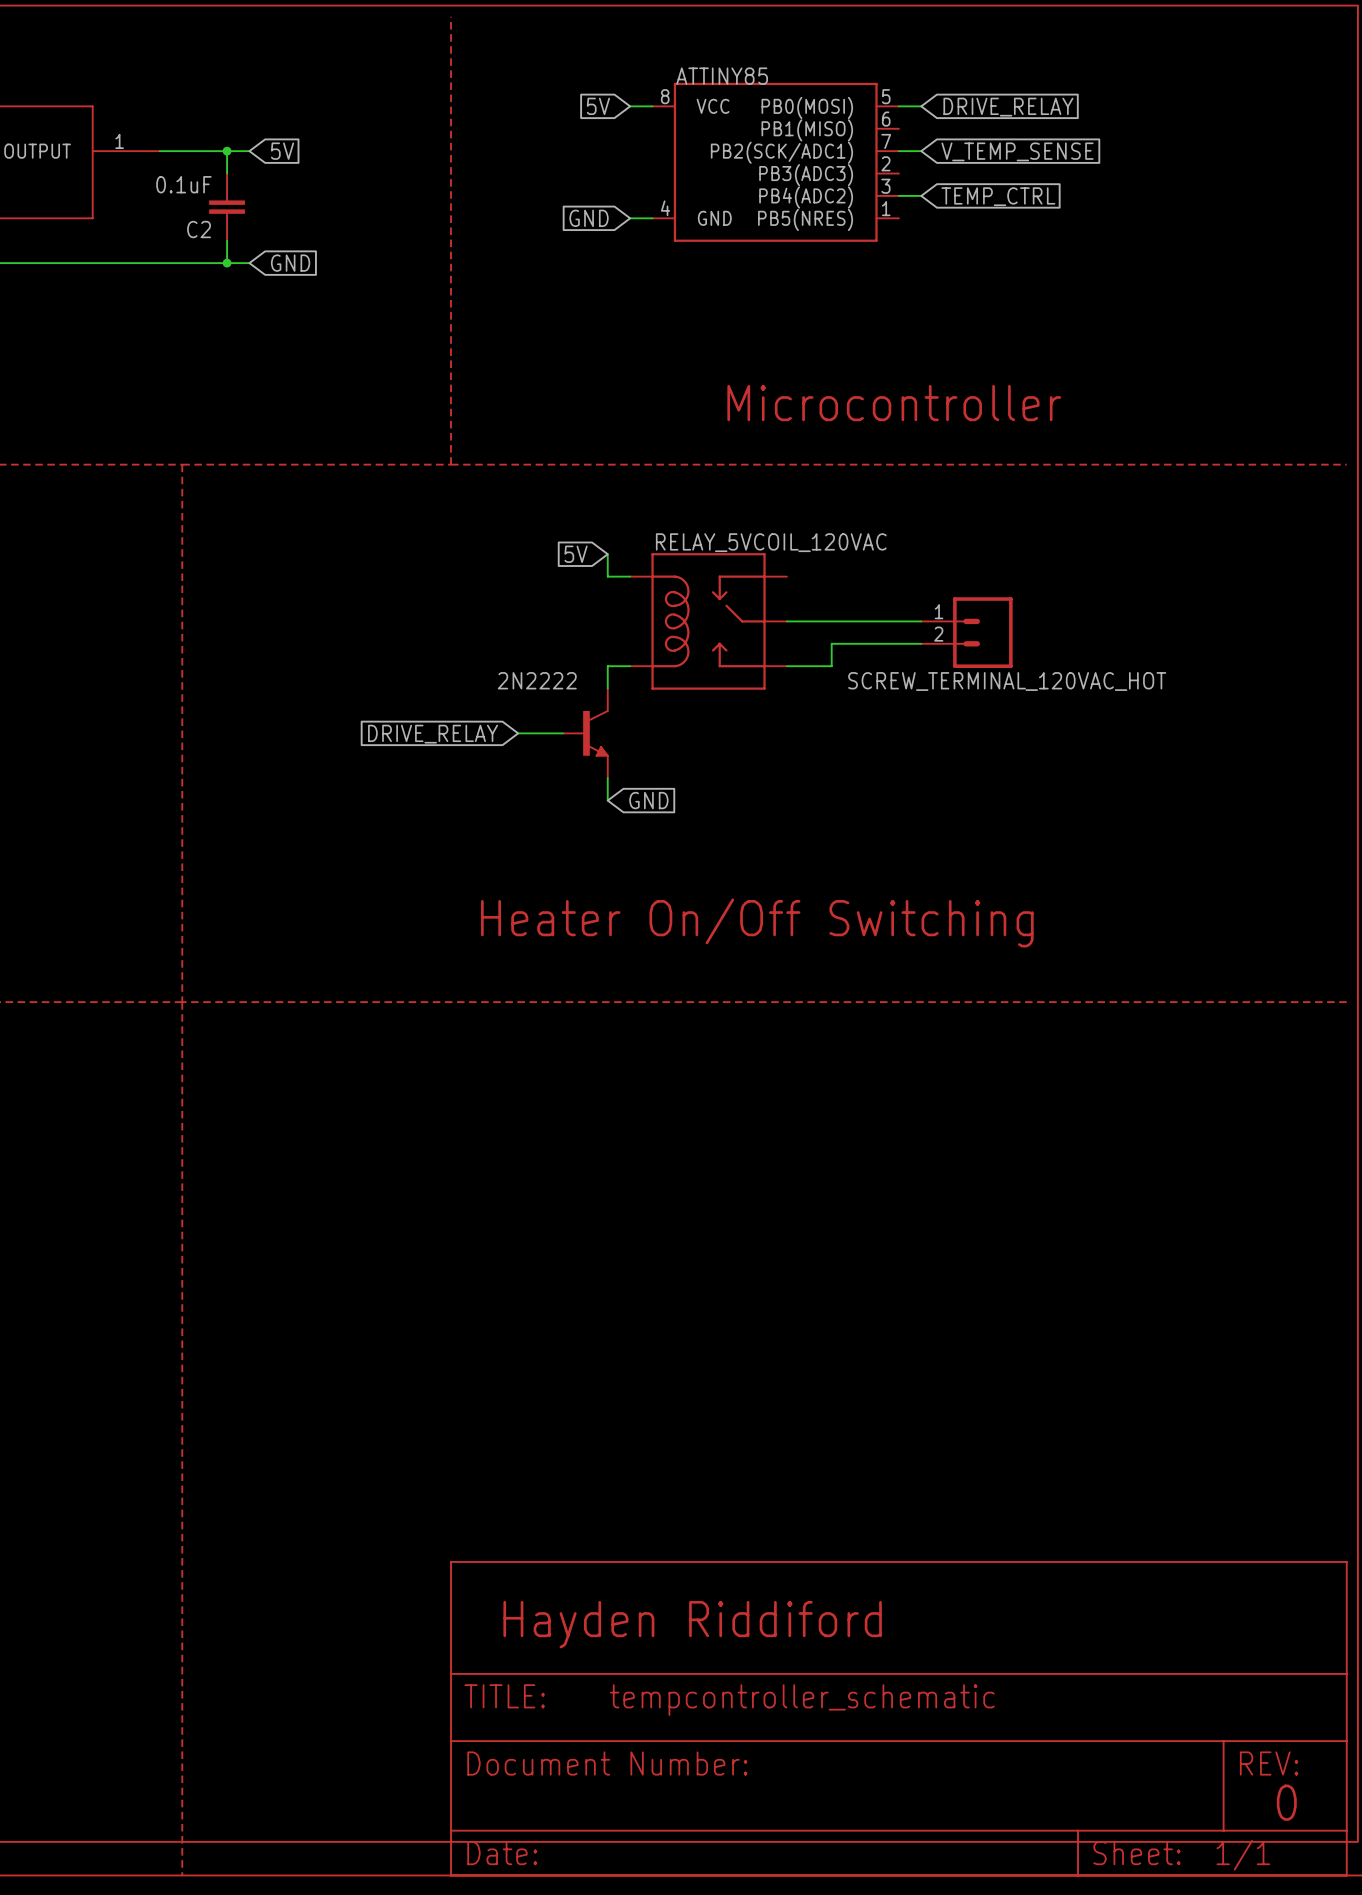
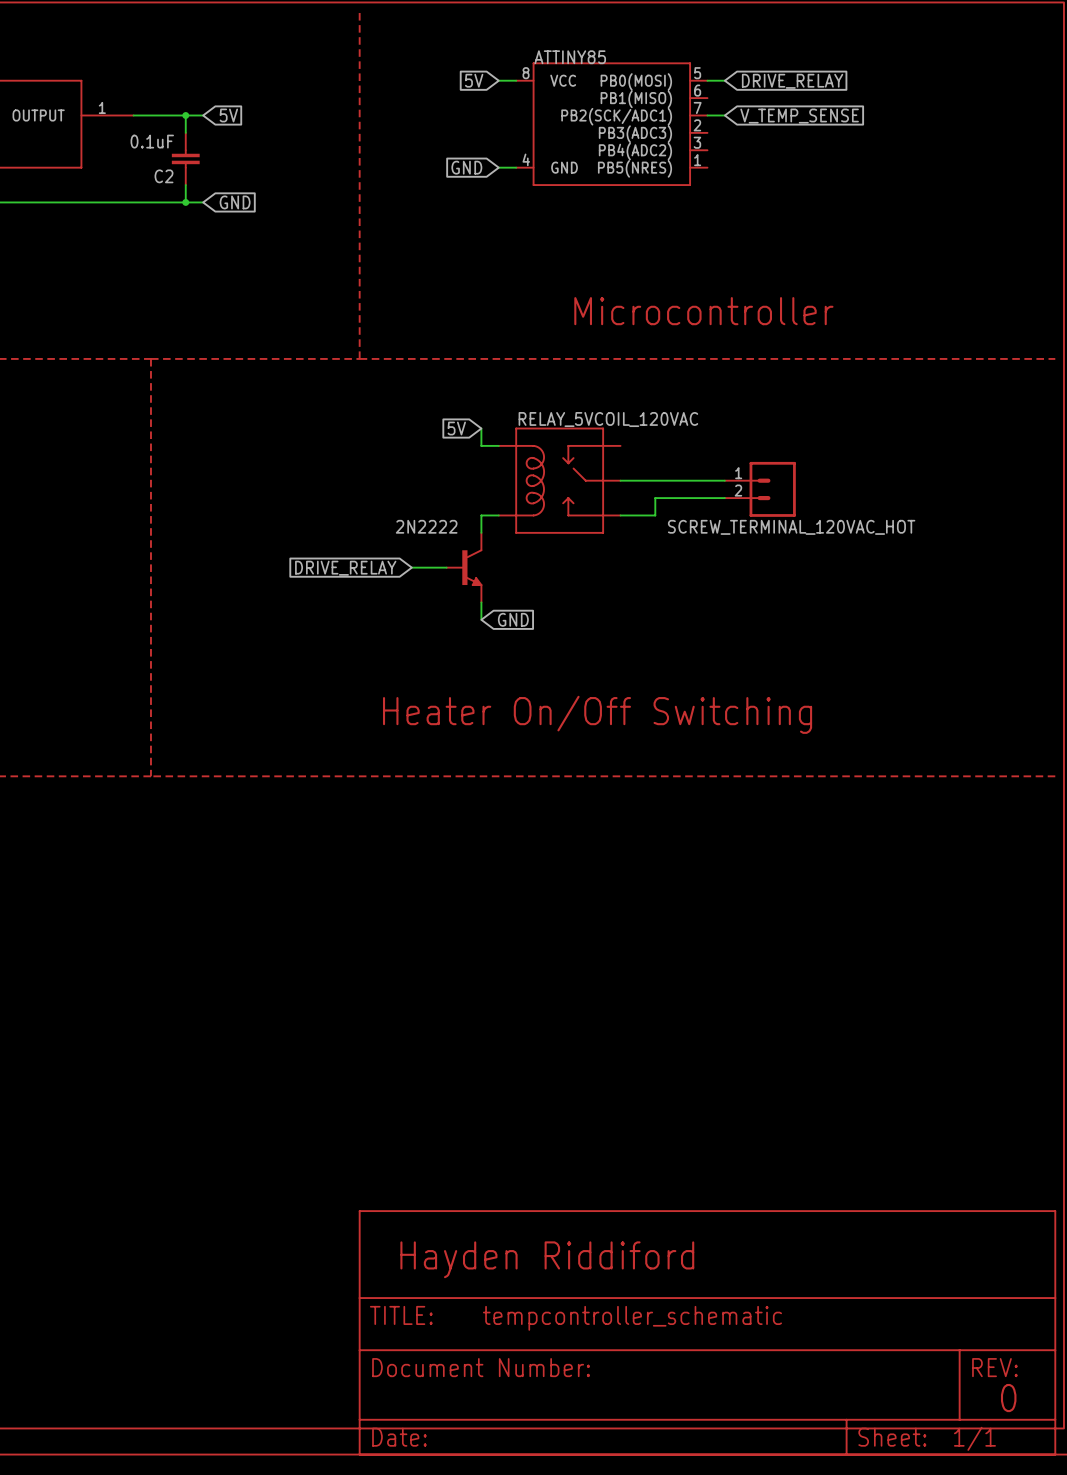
wire: (898, 195) (921, 195) -> none
global label: TEMP_CTRL (998, 196) -> none
line: (182, 1002) (182, 1875) -> none

